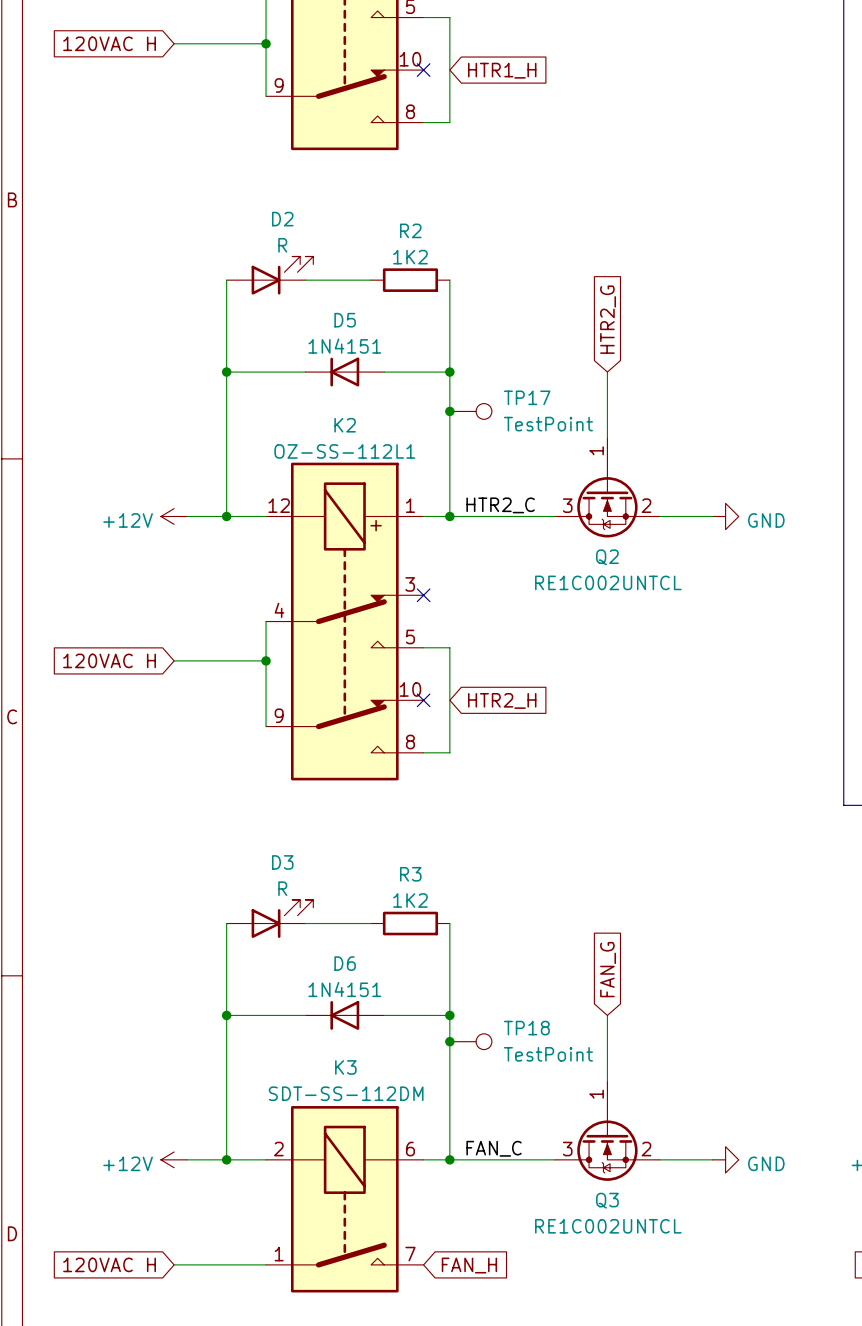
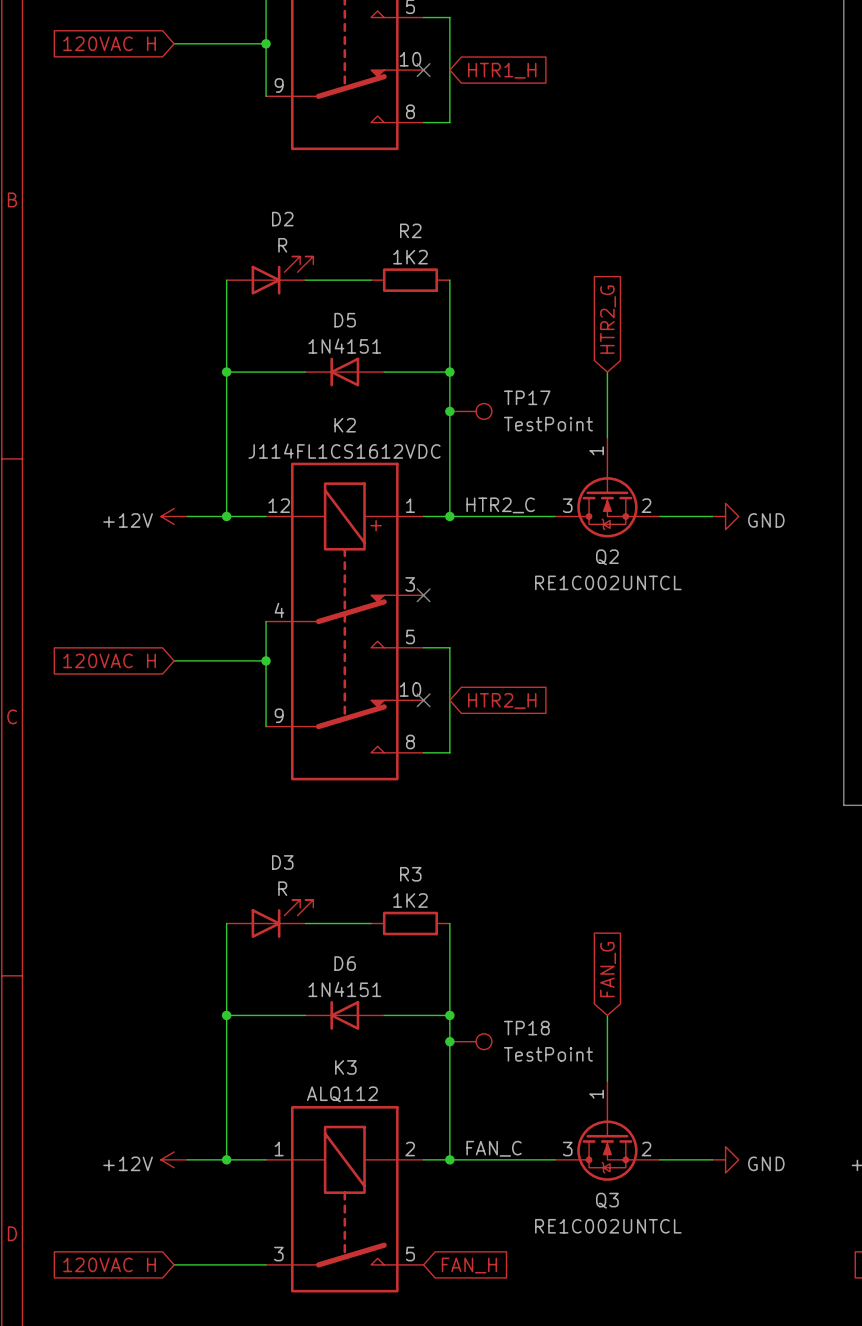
K2 value: OZ-SS-112L1 (344, 451) -> J114FL1CS1612VDC (344, 451)
K3 value: SDT-SS-112DM (346, 1093) -> ALQ112 (342, 1094)
K3 pin number: 2 (278, 1149) -> 1 (279, 1149)
K3 pin number: 6 (410, 1149) -> 2 (410, 1149)
K3 pin number: 1 (279, 1254) -> 3 (278, 1254)
K3 pin number: 7 (410, 1254) -> 5 (410, 1254)

